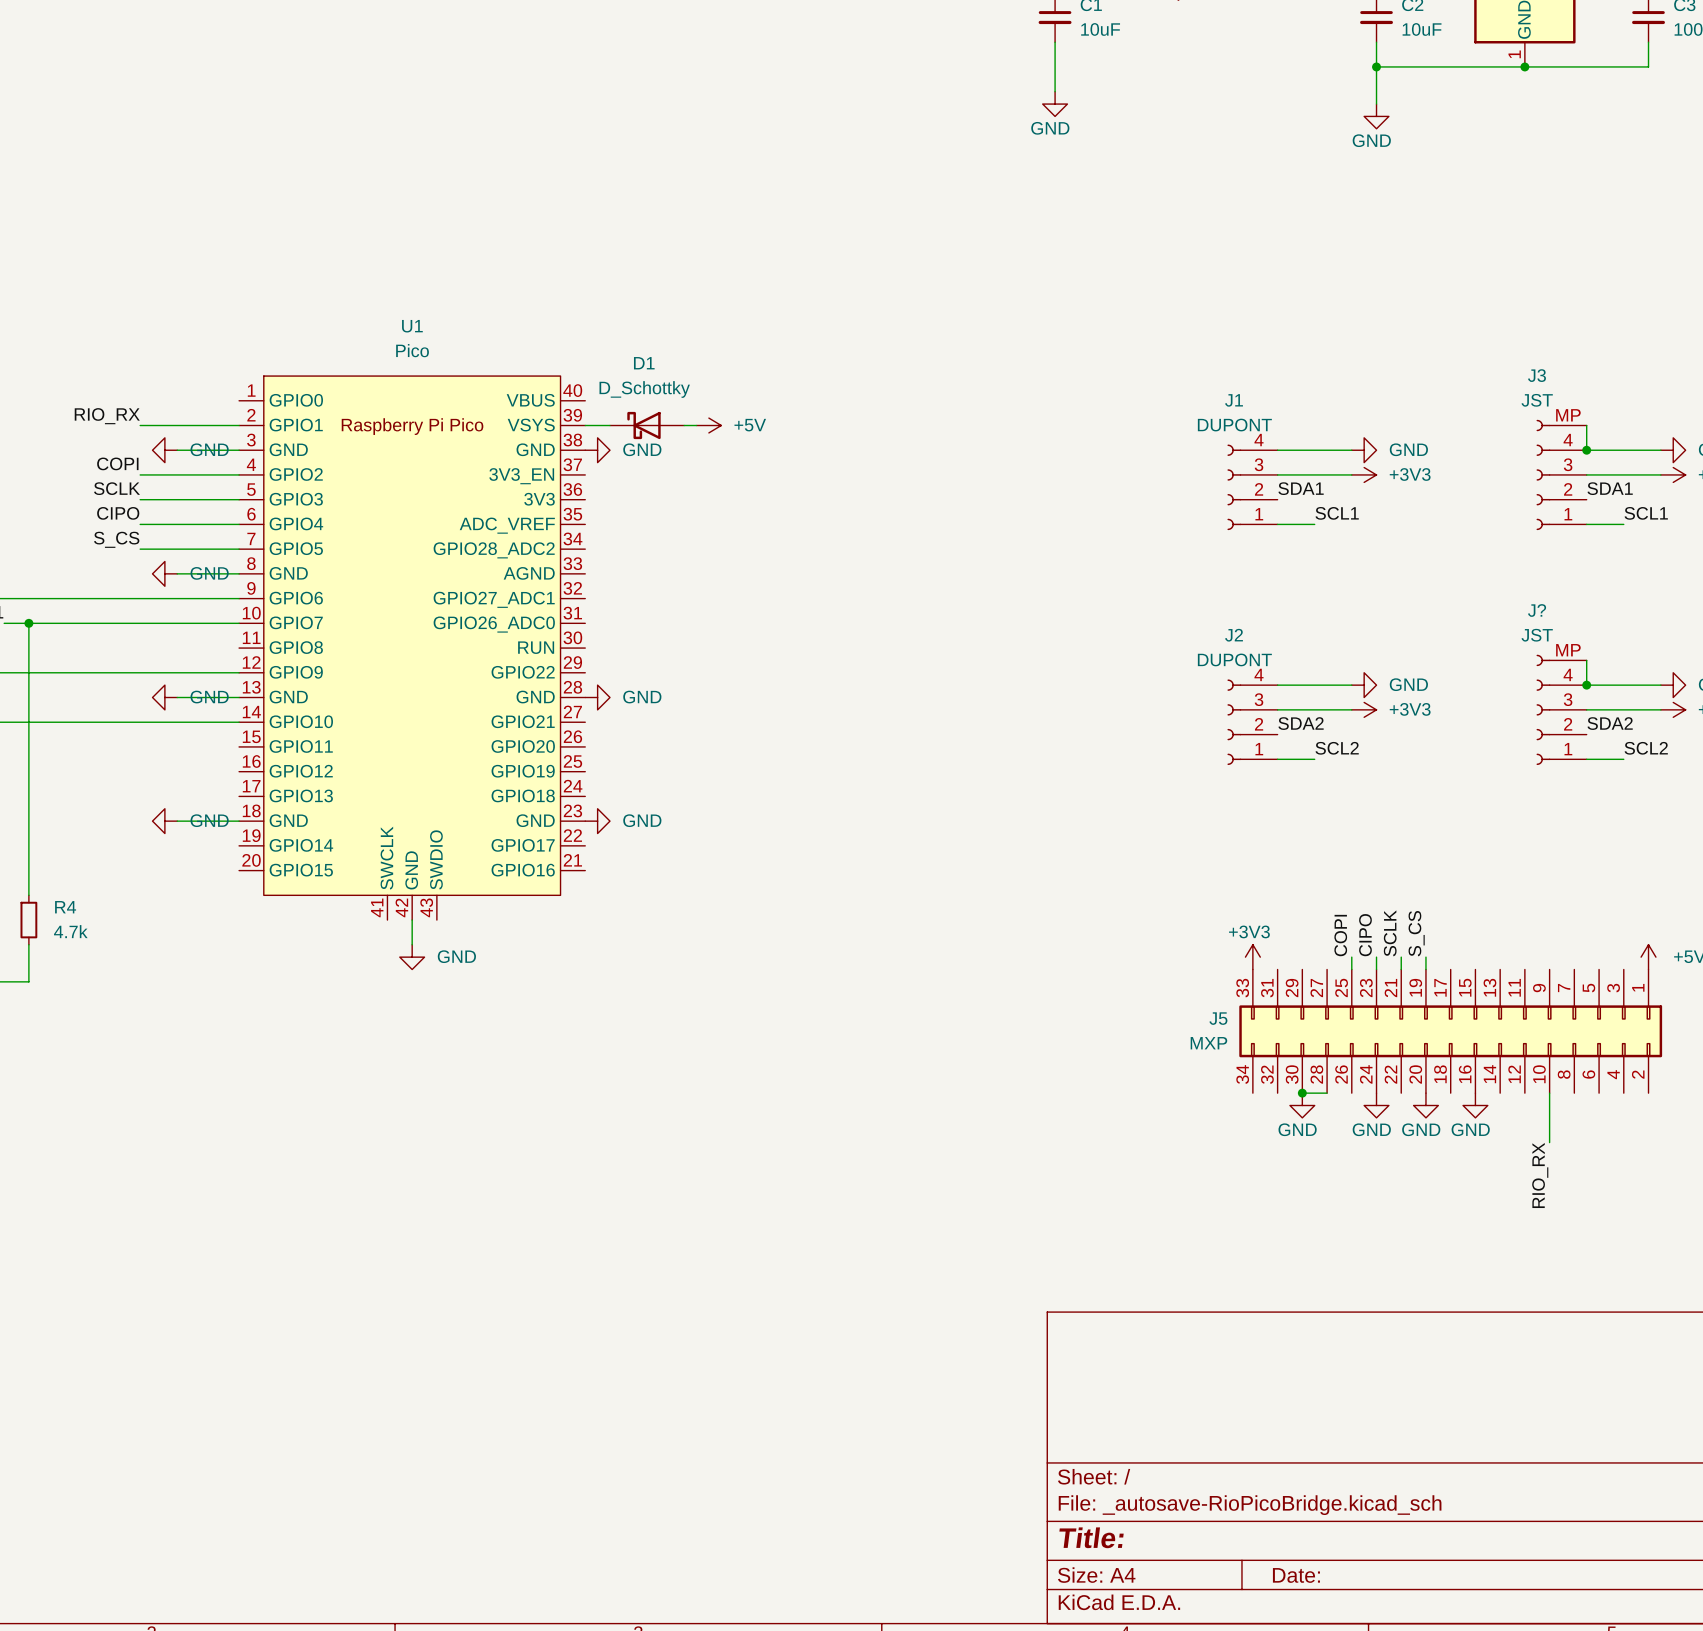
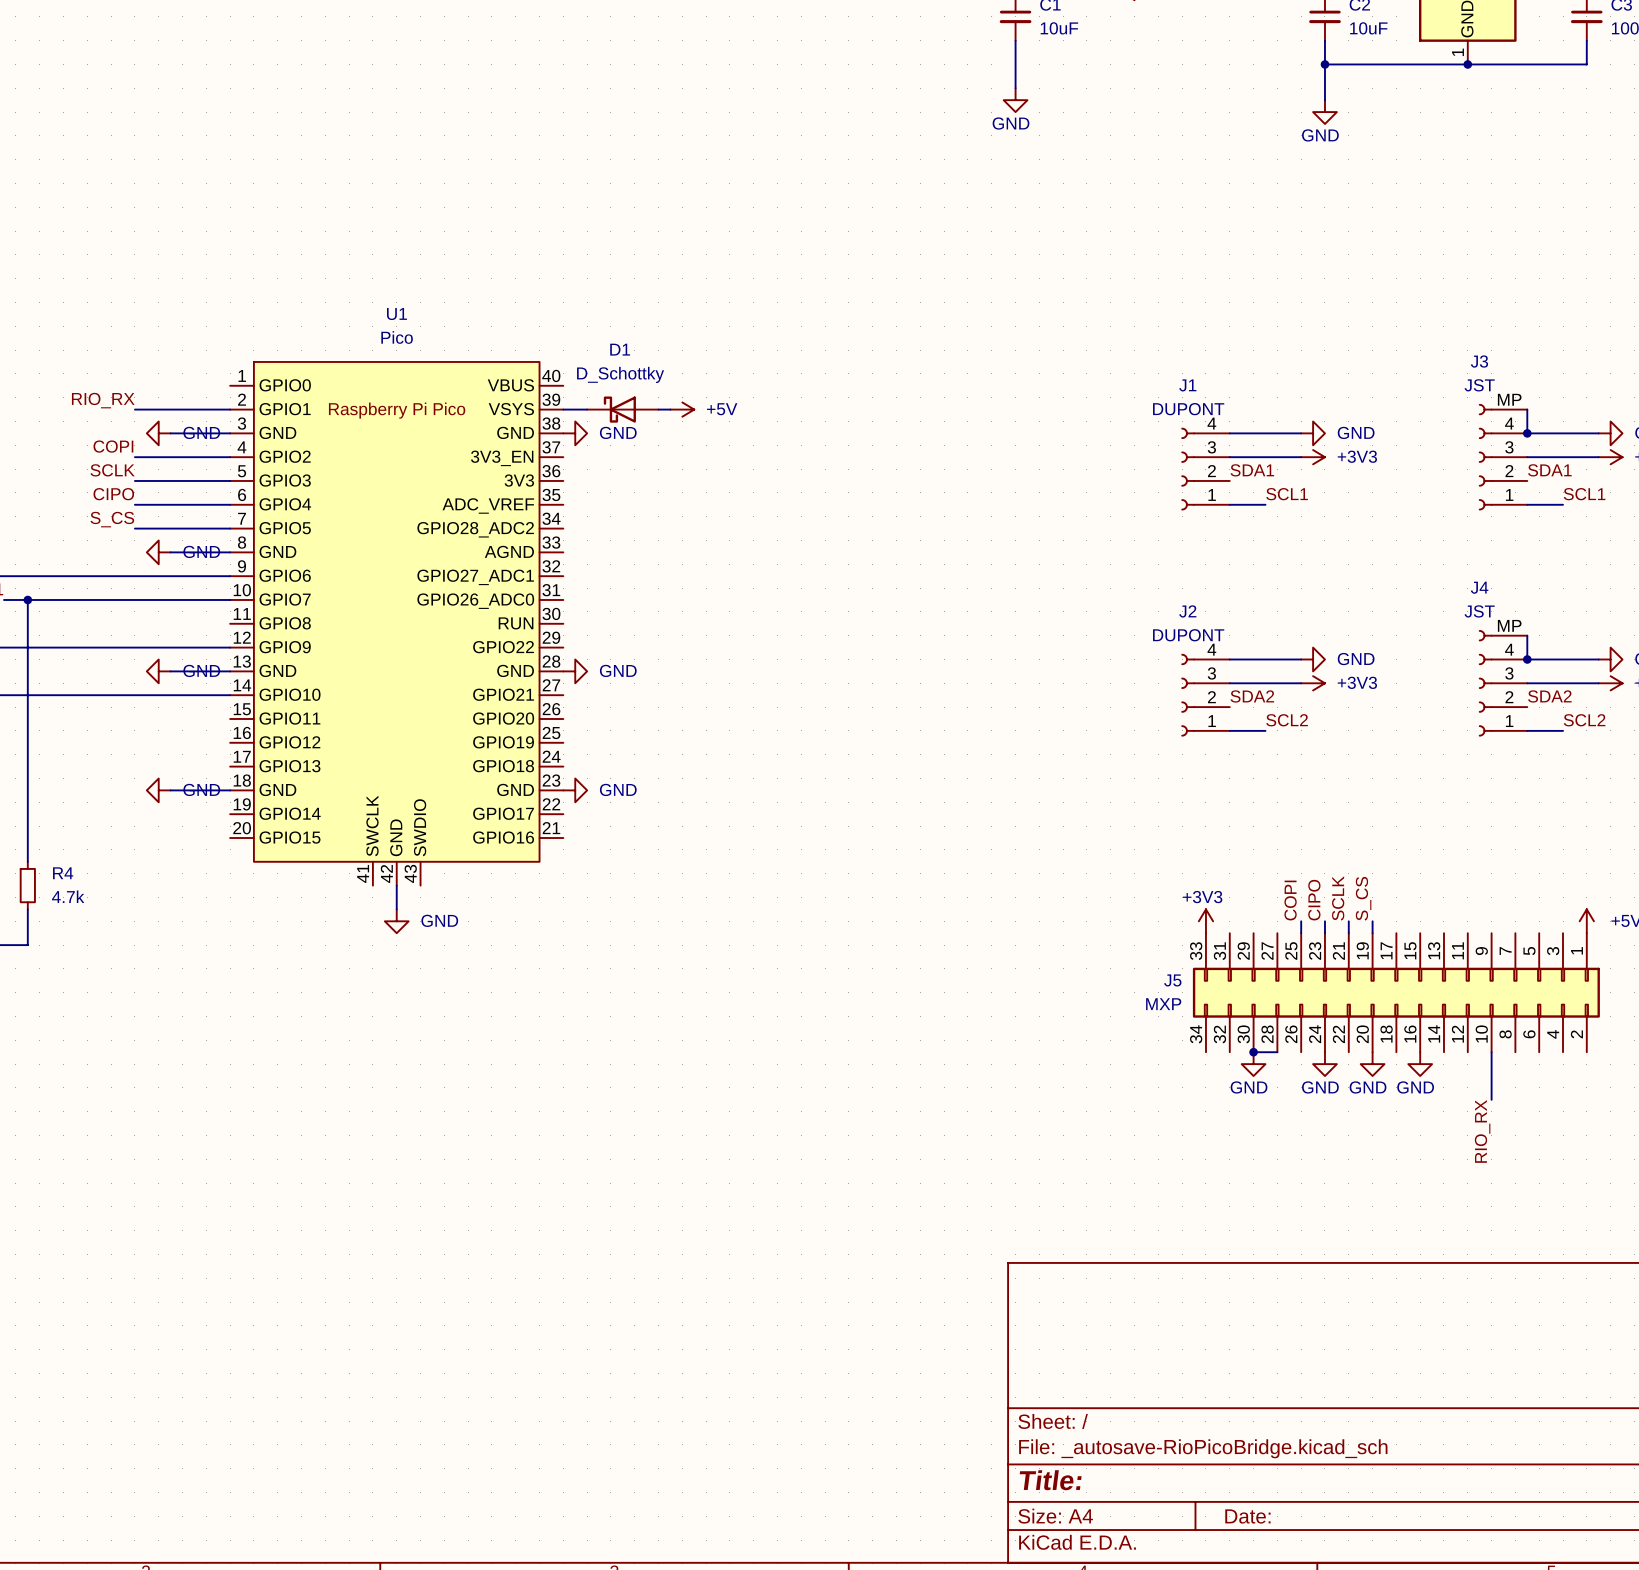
J? name: J? (1537, 610) -> J4 (1479, 587)

